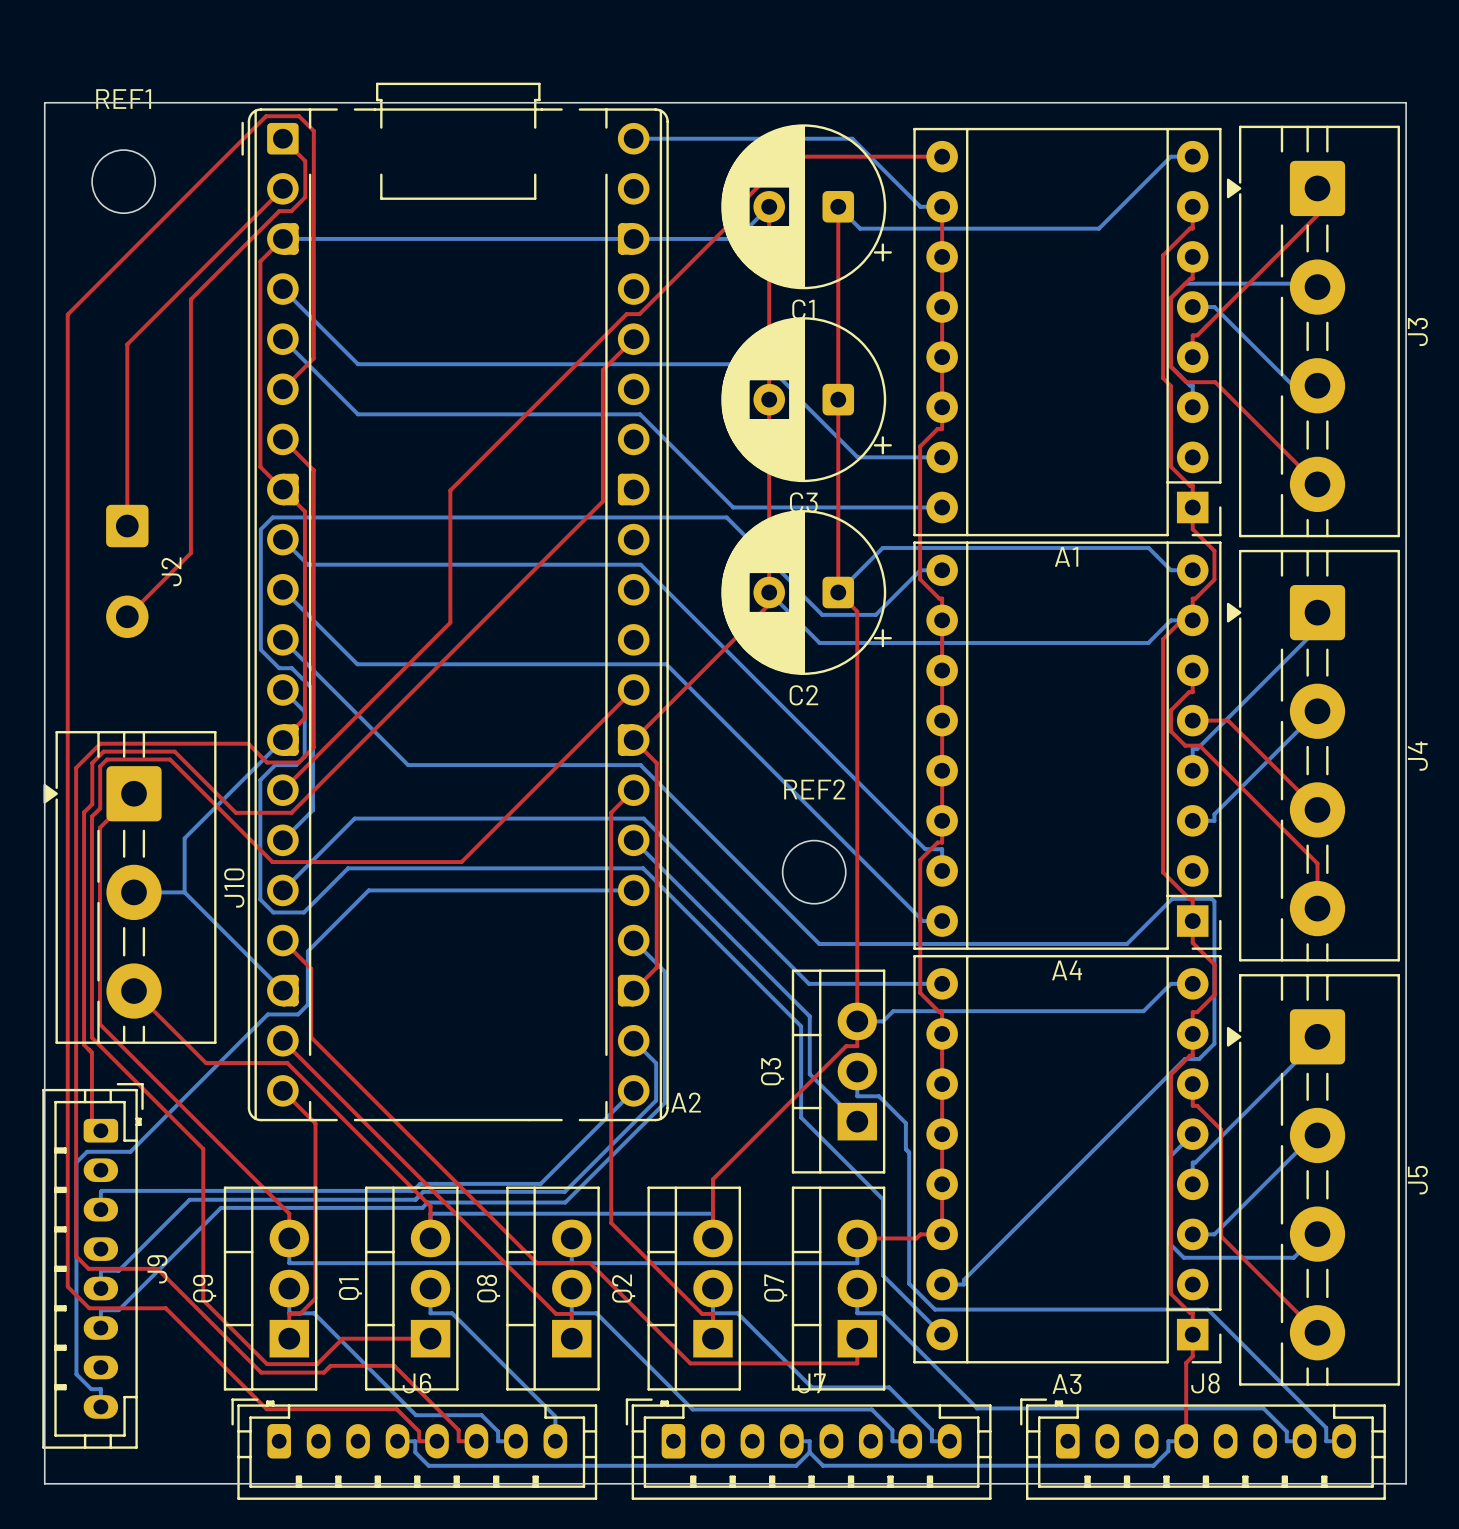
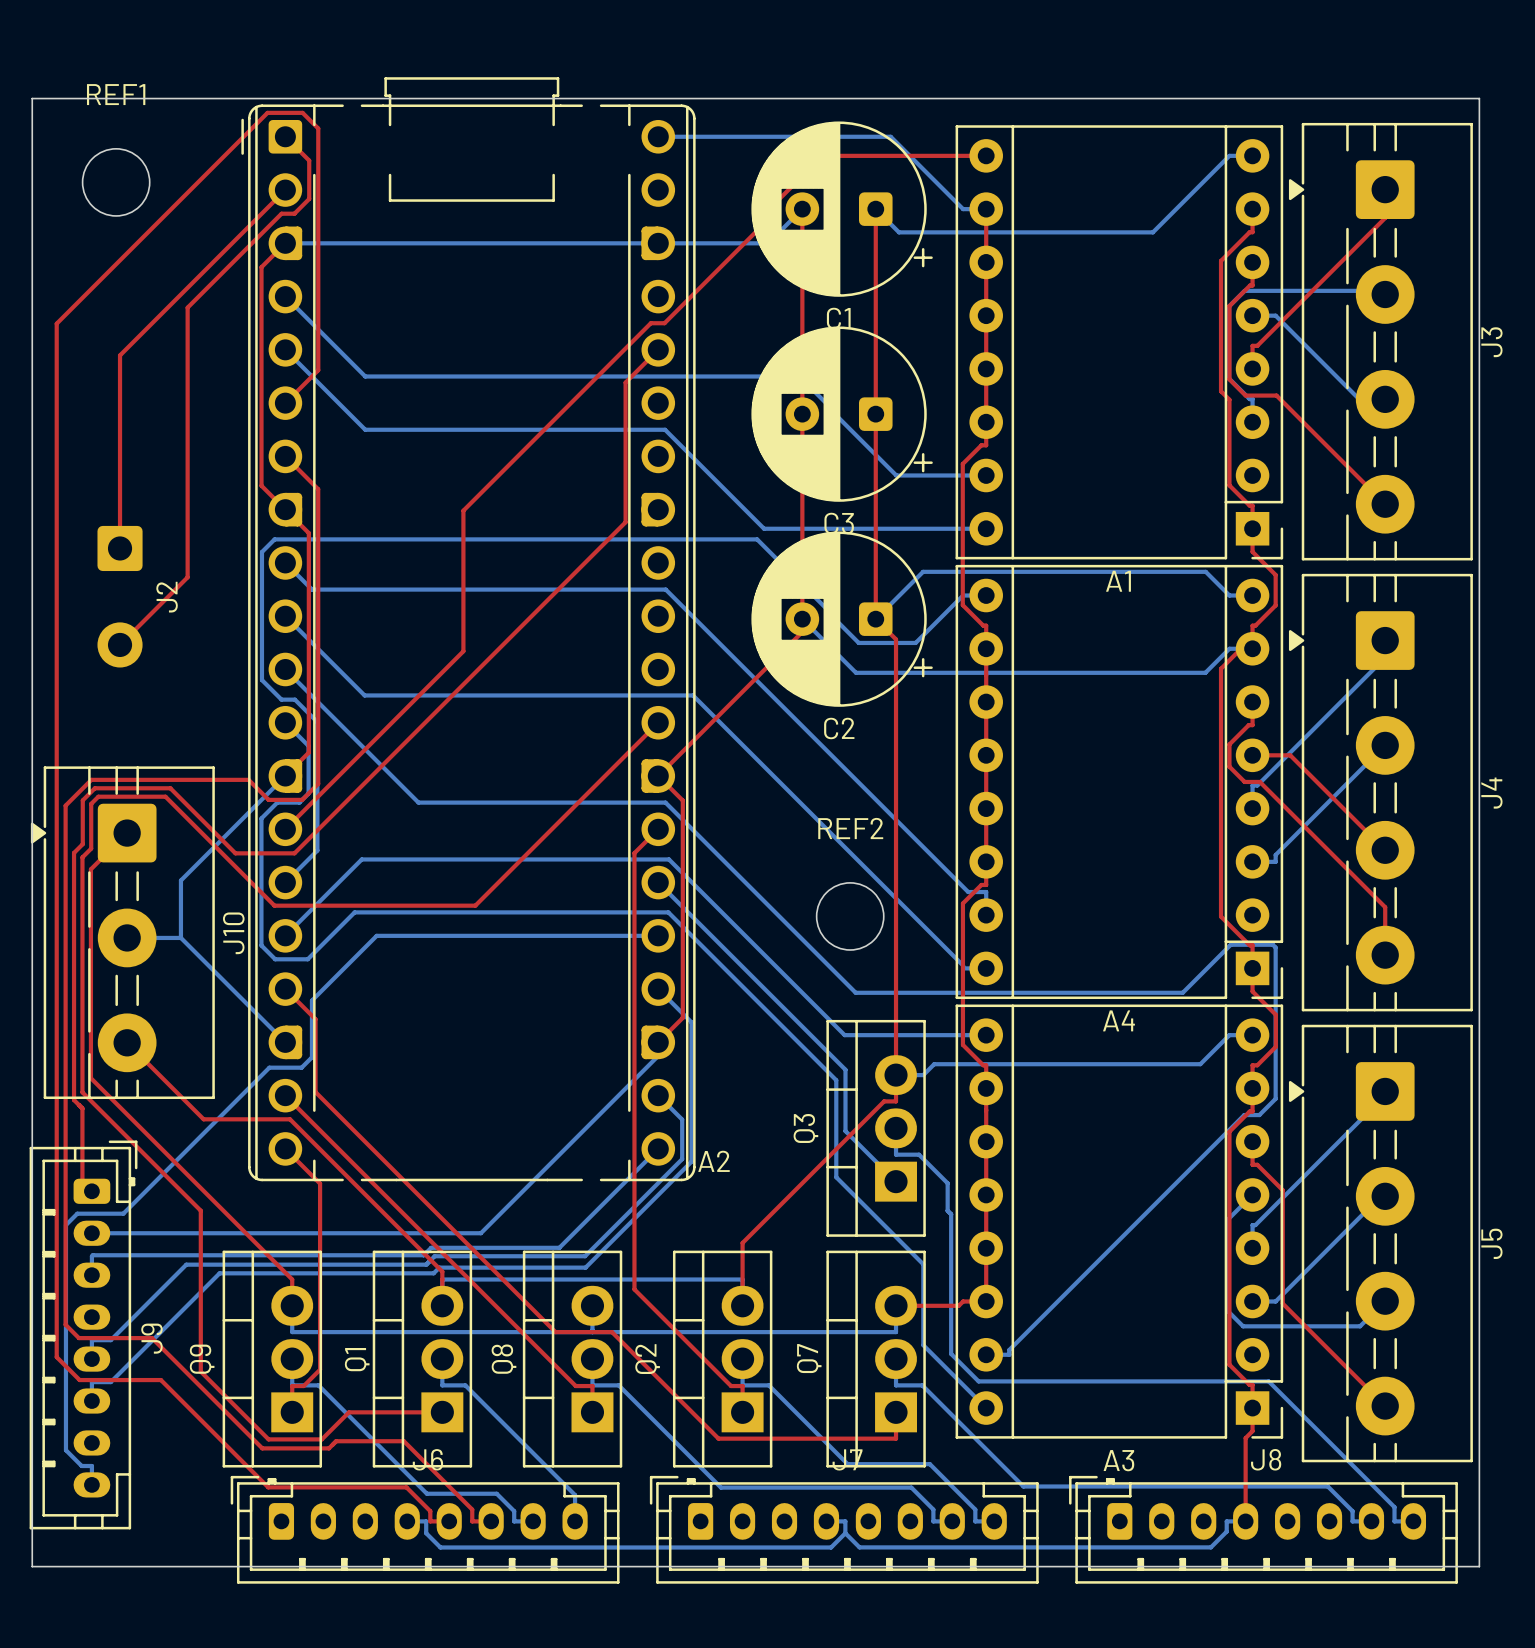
bottom track: none -> (658, 1042) (658, 1055) (480, 1233) (91, 1233)

